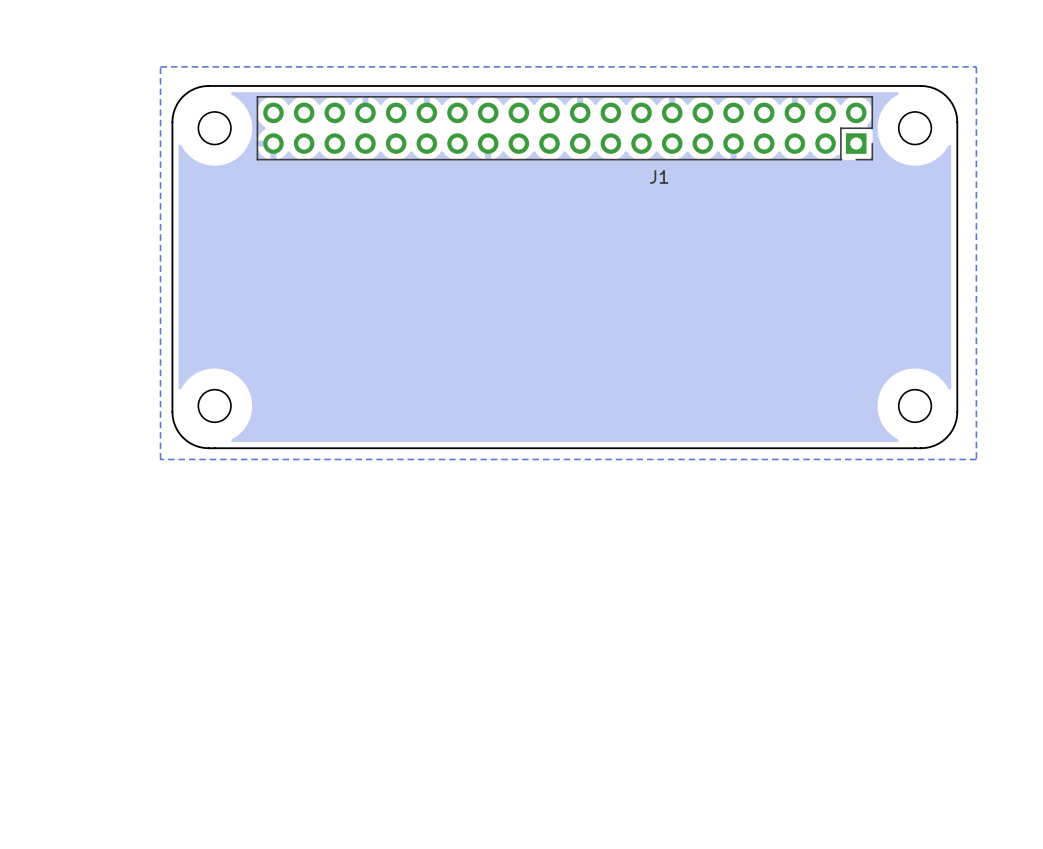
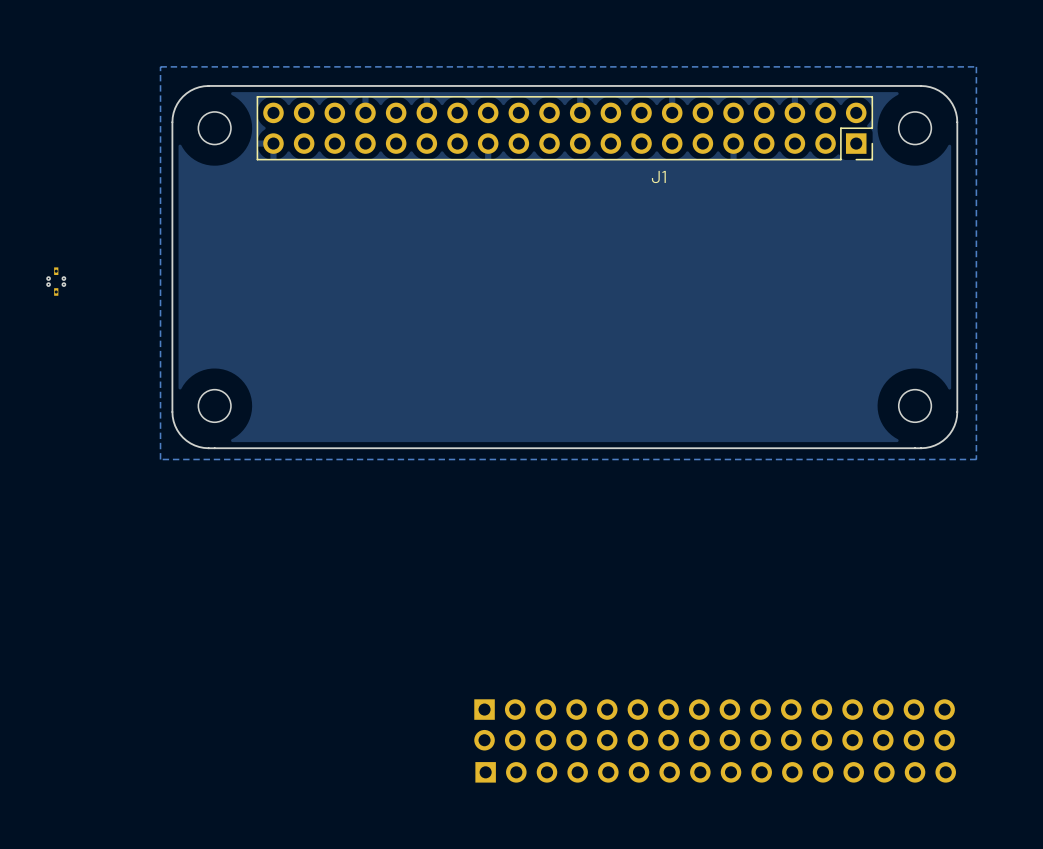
part: none -> (56, 281)
part: none -> (714, 724)
part: none -> (715, 772)

